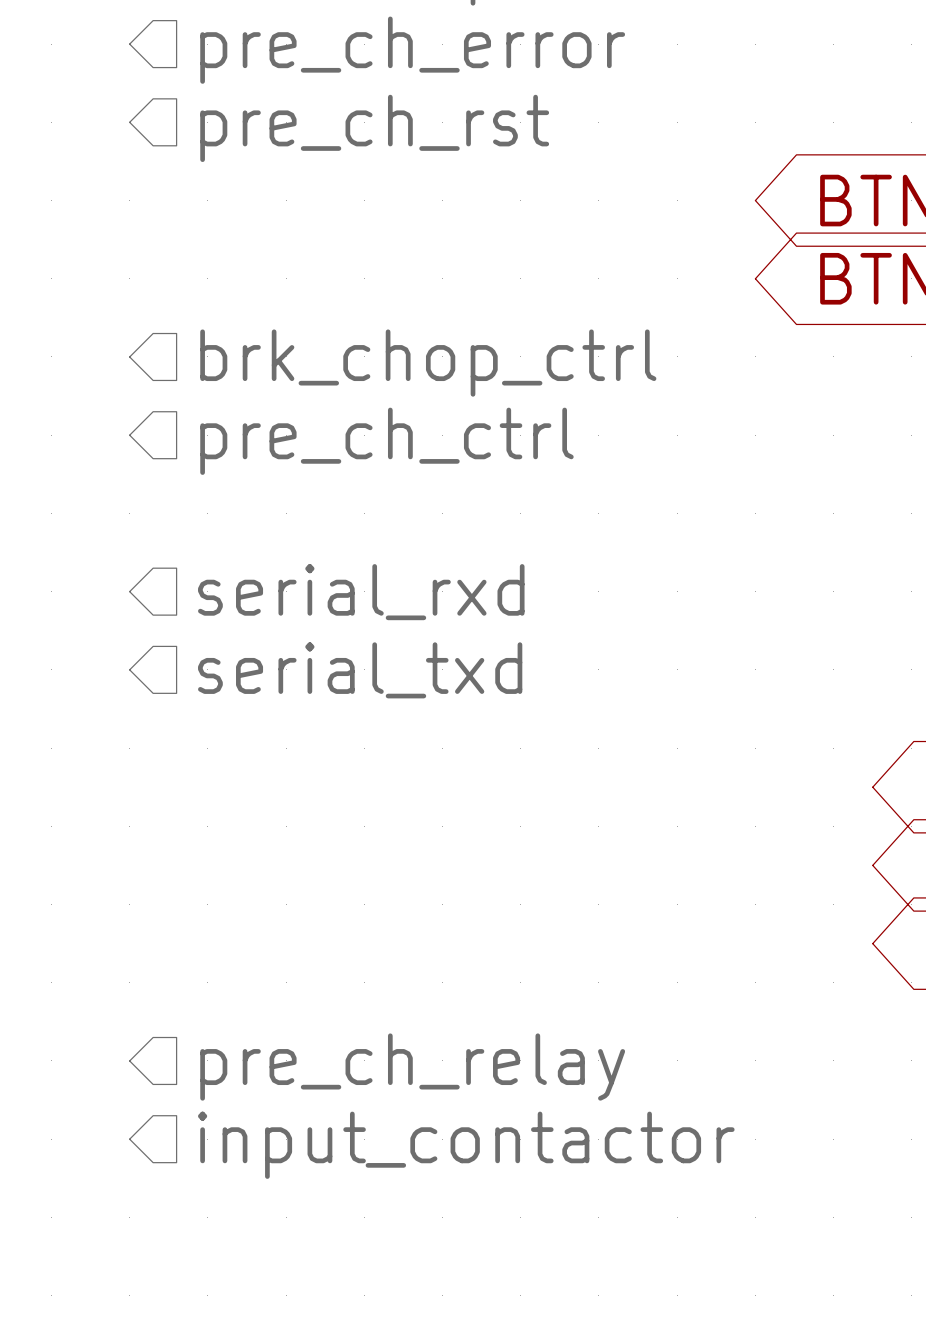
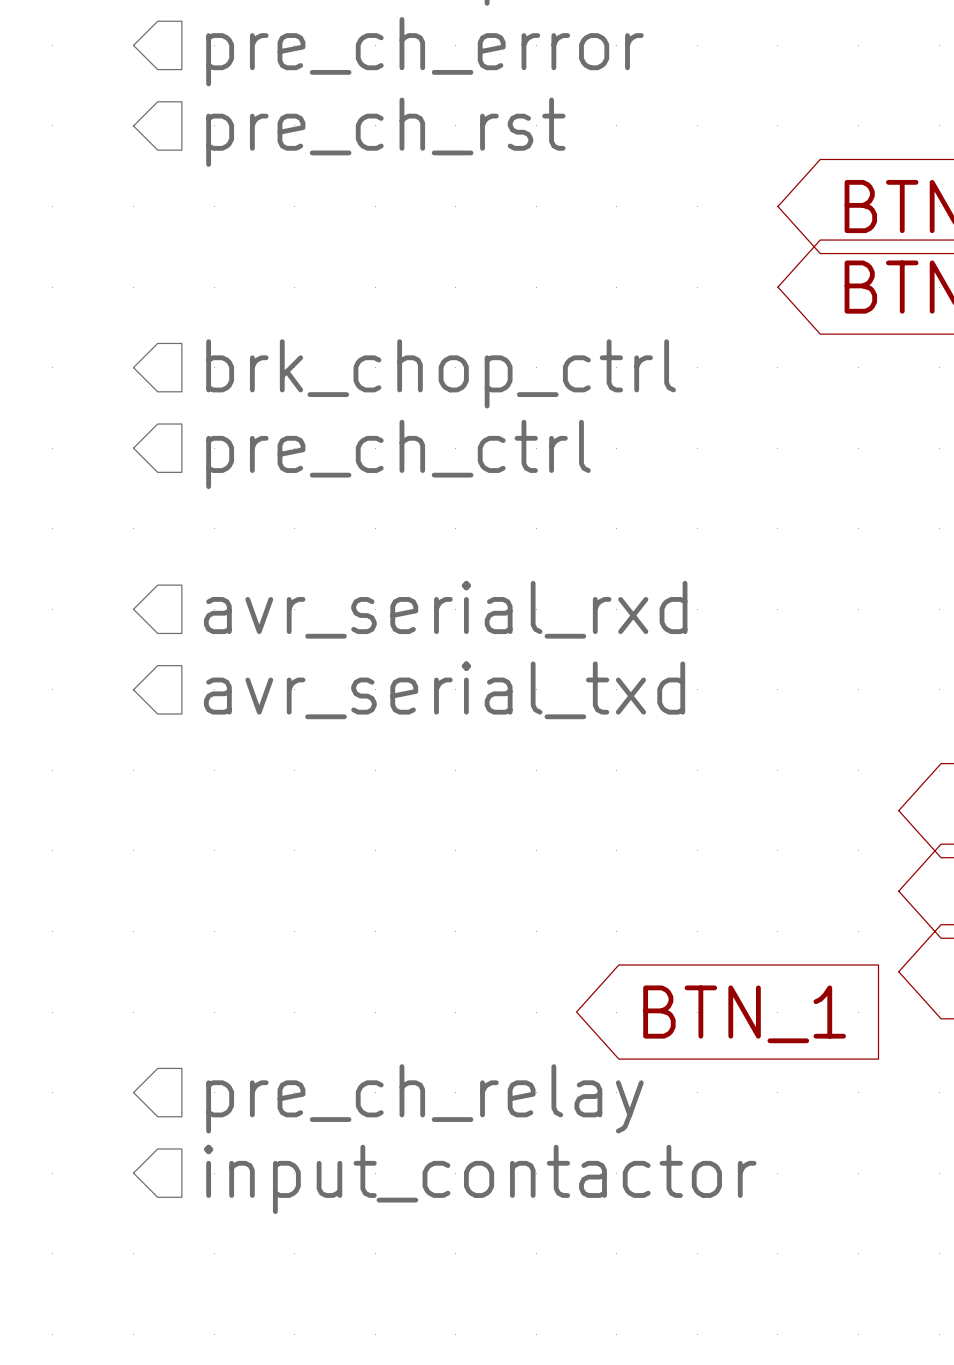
hierarchical label: serial_rxd (361, 592) -> avr_serial_rxd (445, 609)
hierarchical label: serial_txd (360, 670) -> avr_serial_txd (444, 690)
global label: none -> BTN_1 (744, 1014)

